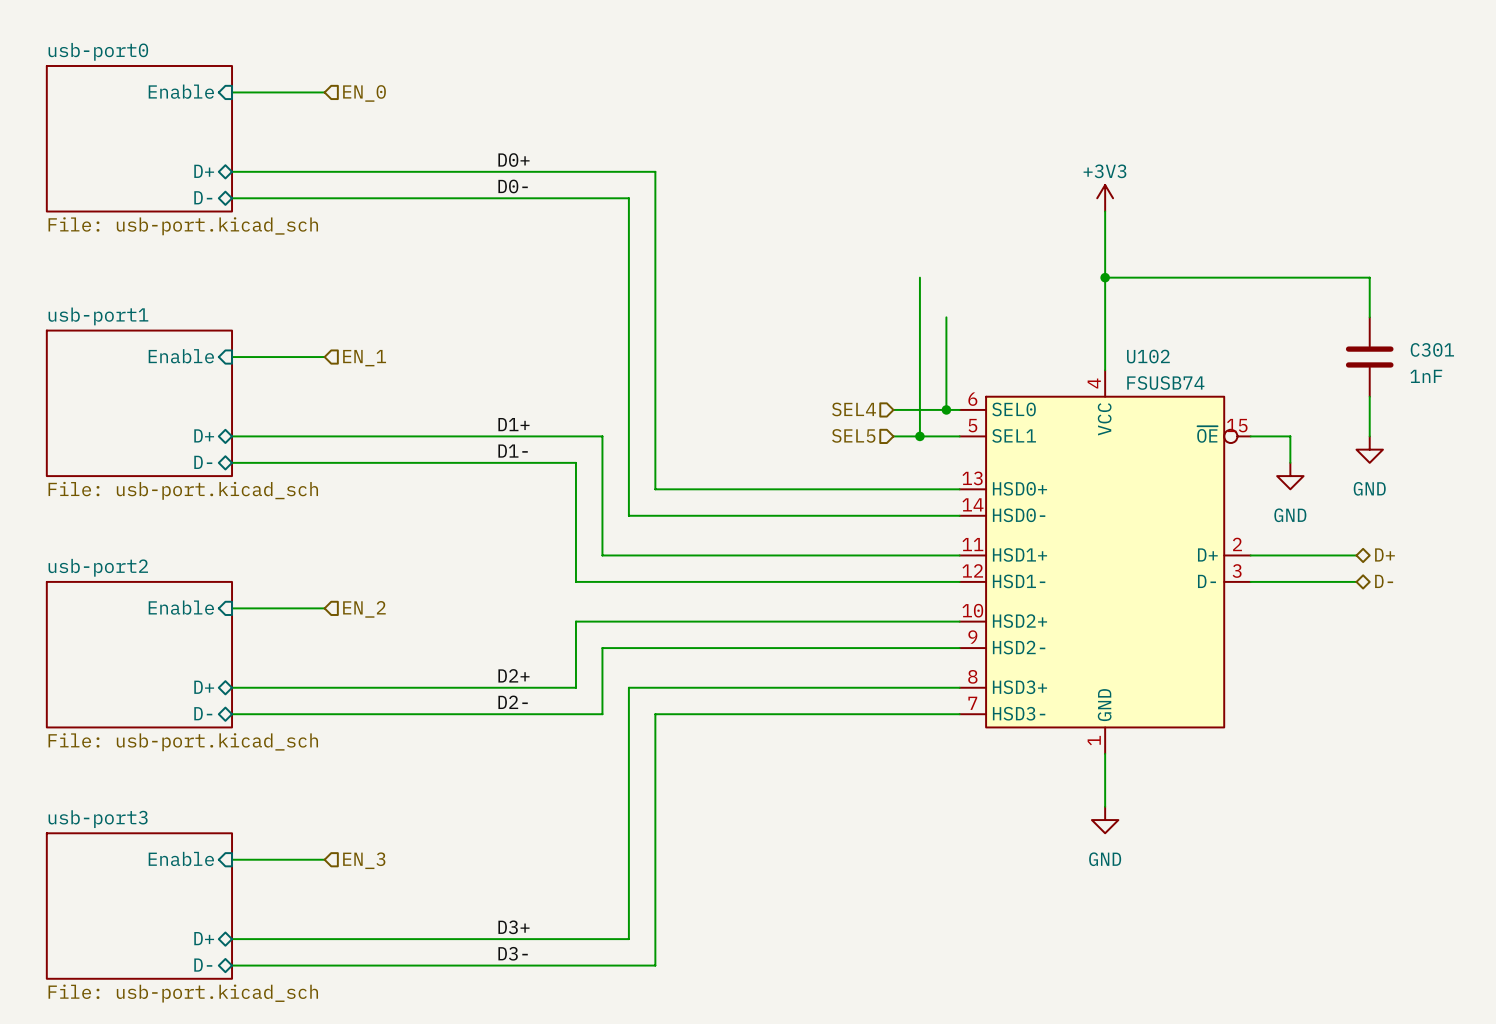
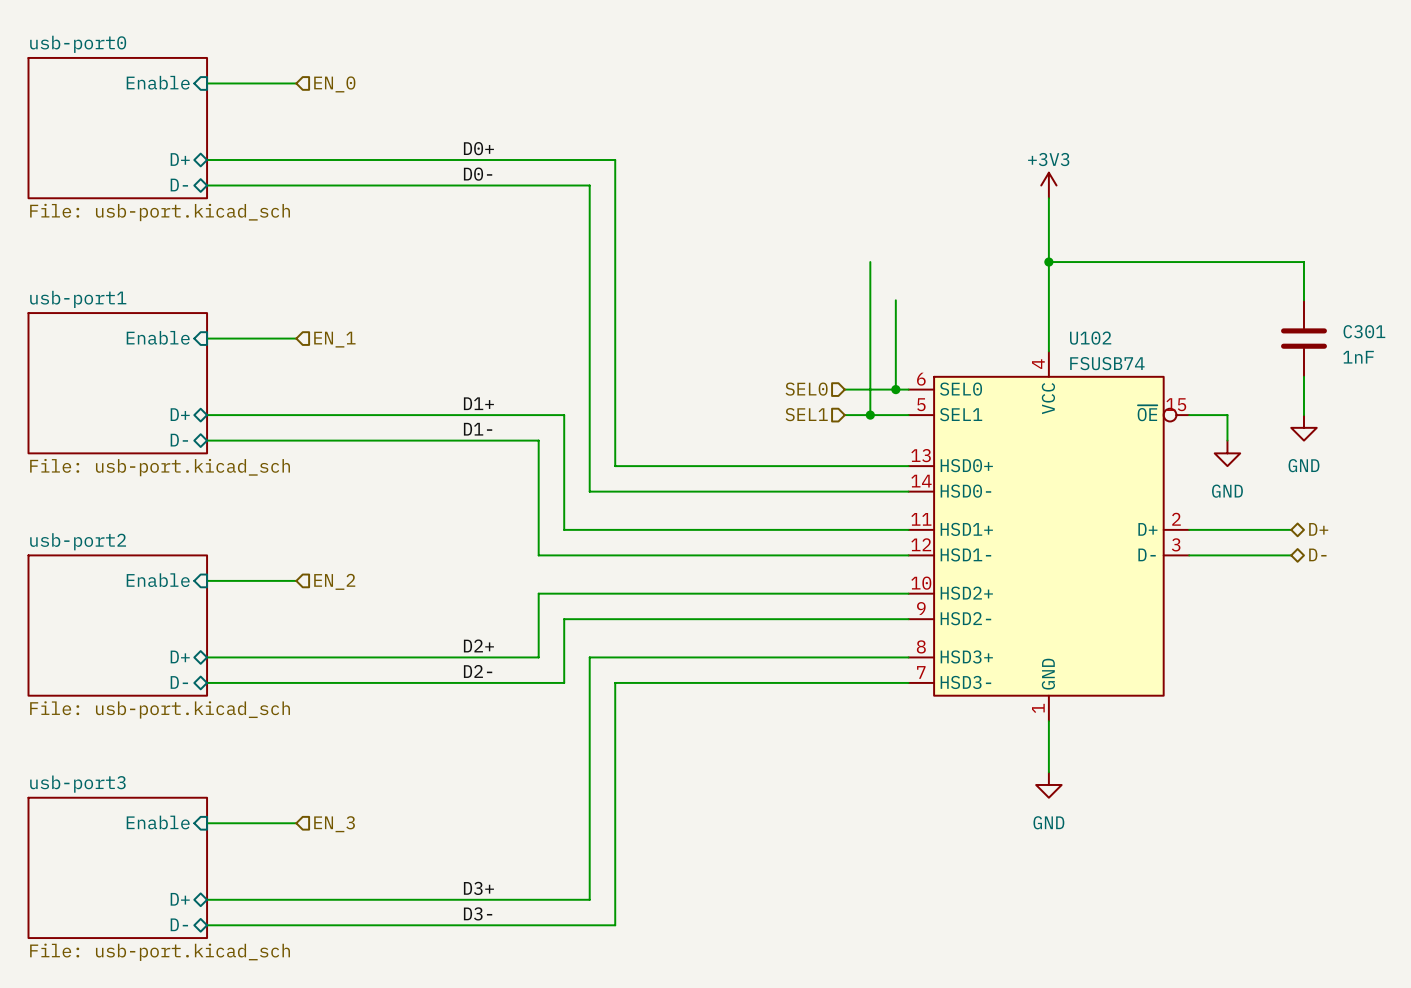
hierarchical label: SEL4 (854, 409) -> SEL0 (806, 389)
hierarchical label: SEL5 (853, 435) -> SEL1 (806, 414)

